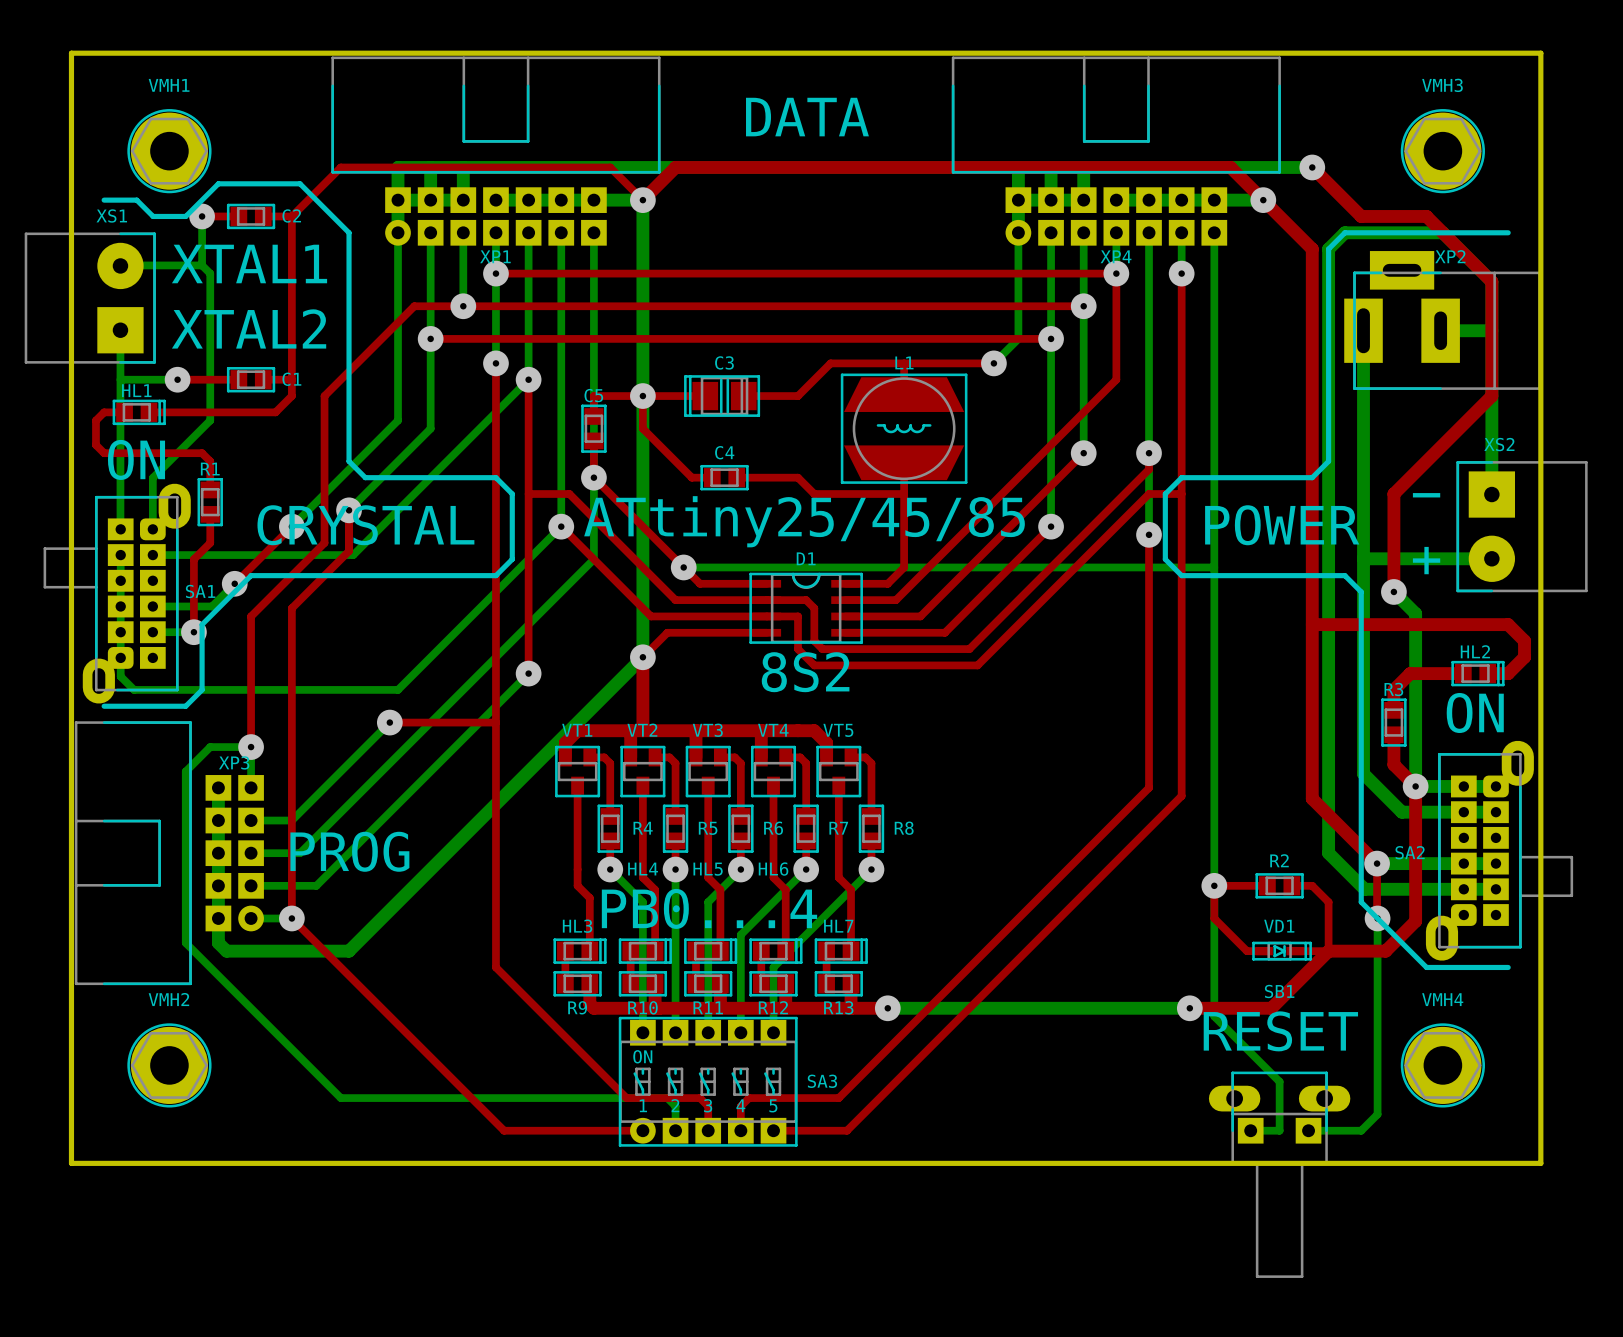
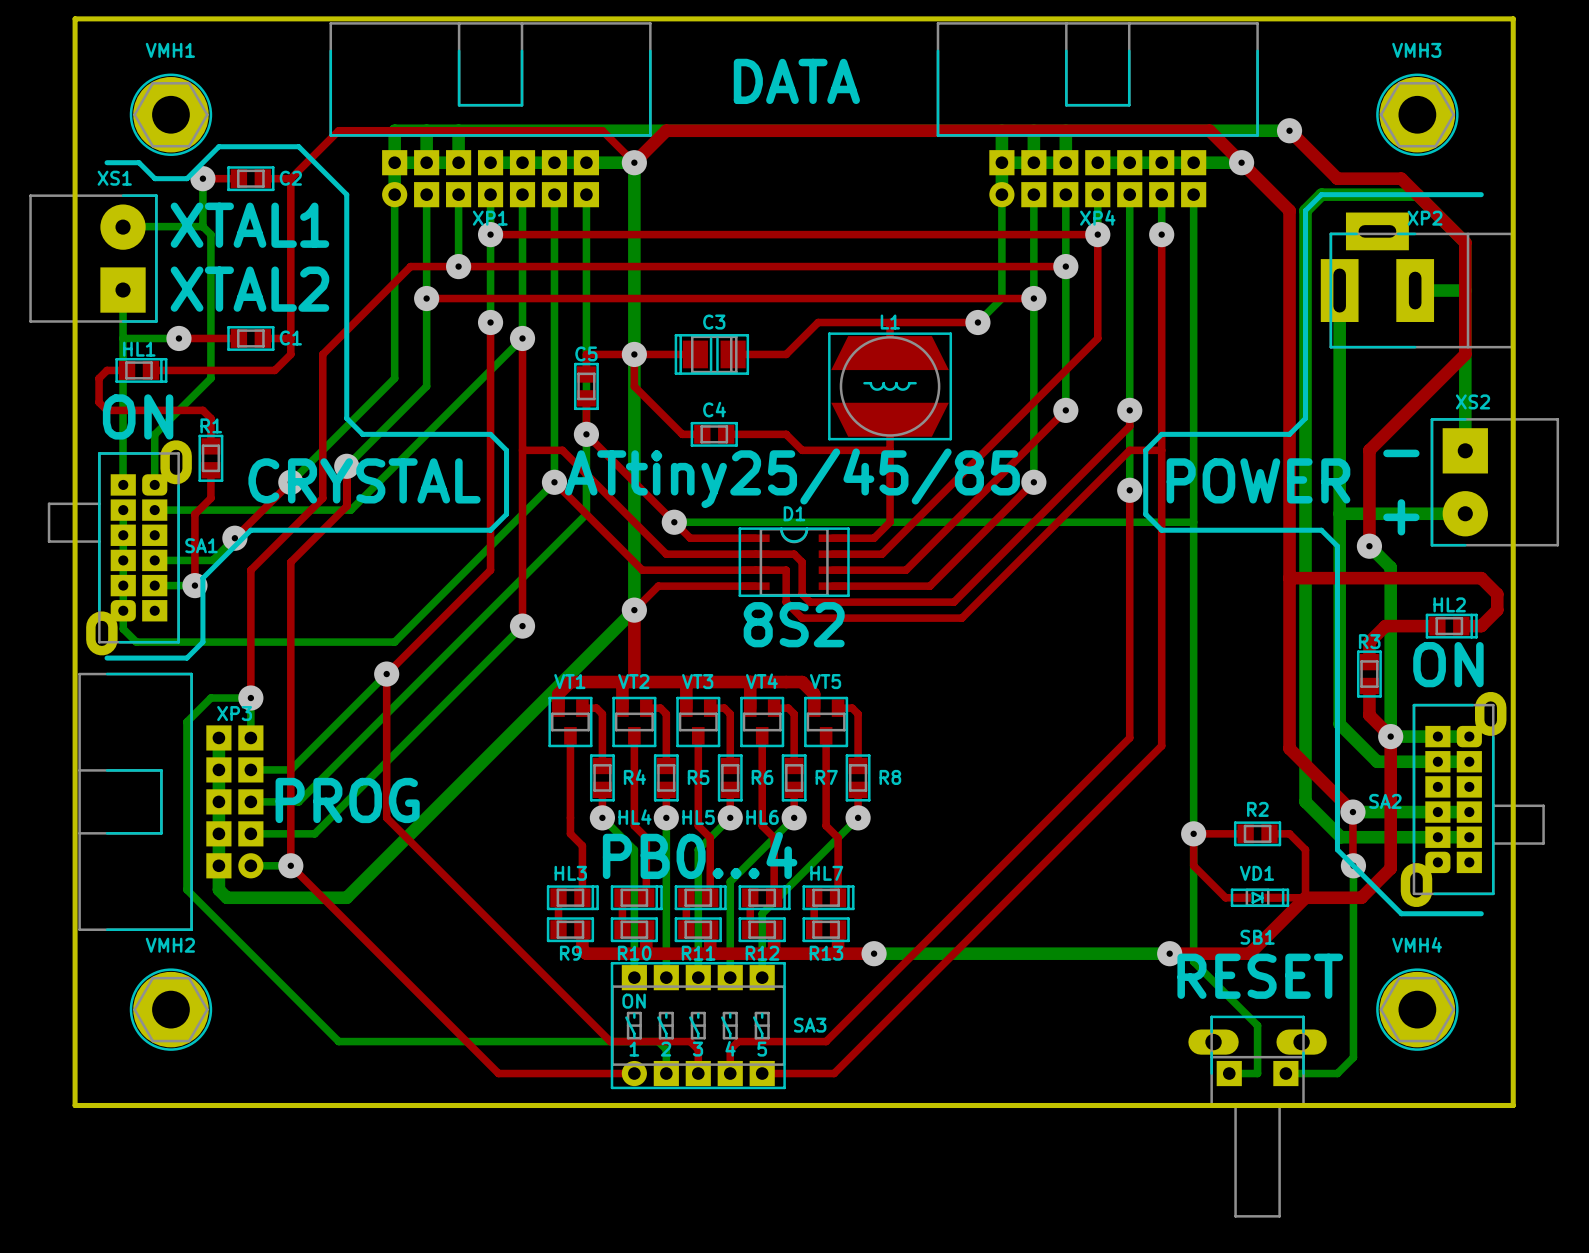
top track: (495, 616) (495, 967) (626, 1098) -> (490, 570) (386, 674) (386, 817) (610, 1041) (618, 1041)
top track: (389, 722) (495, 722) -> none

